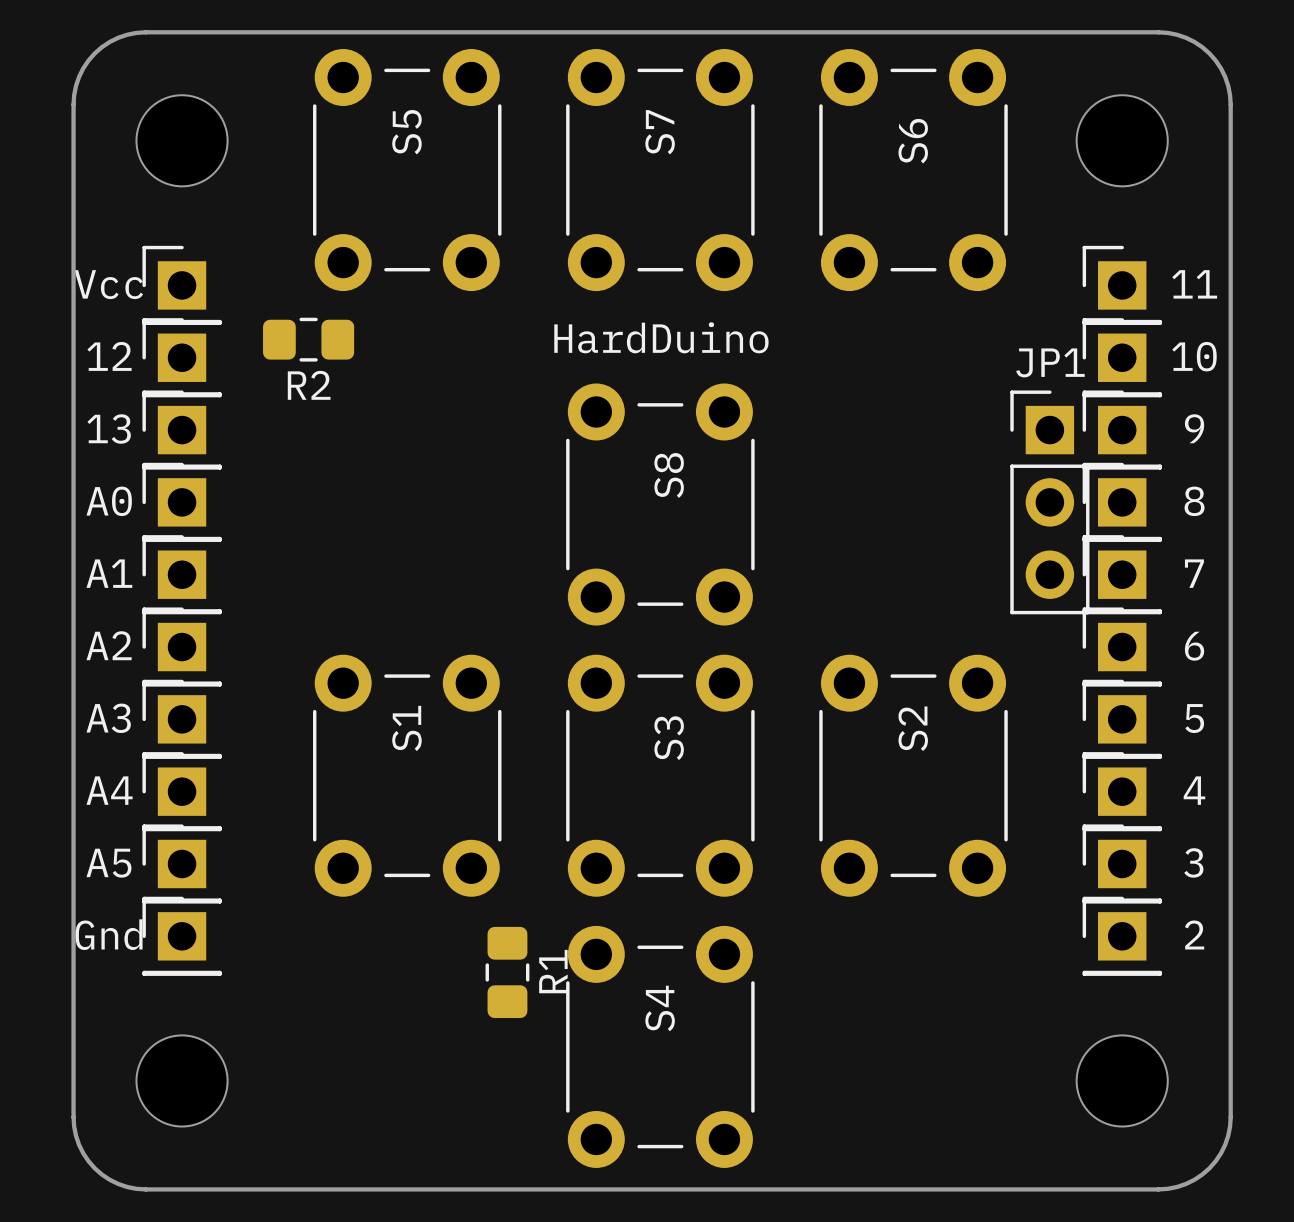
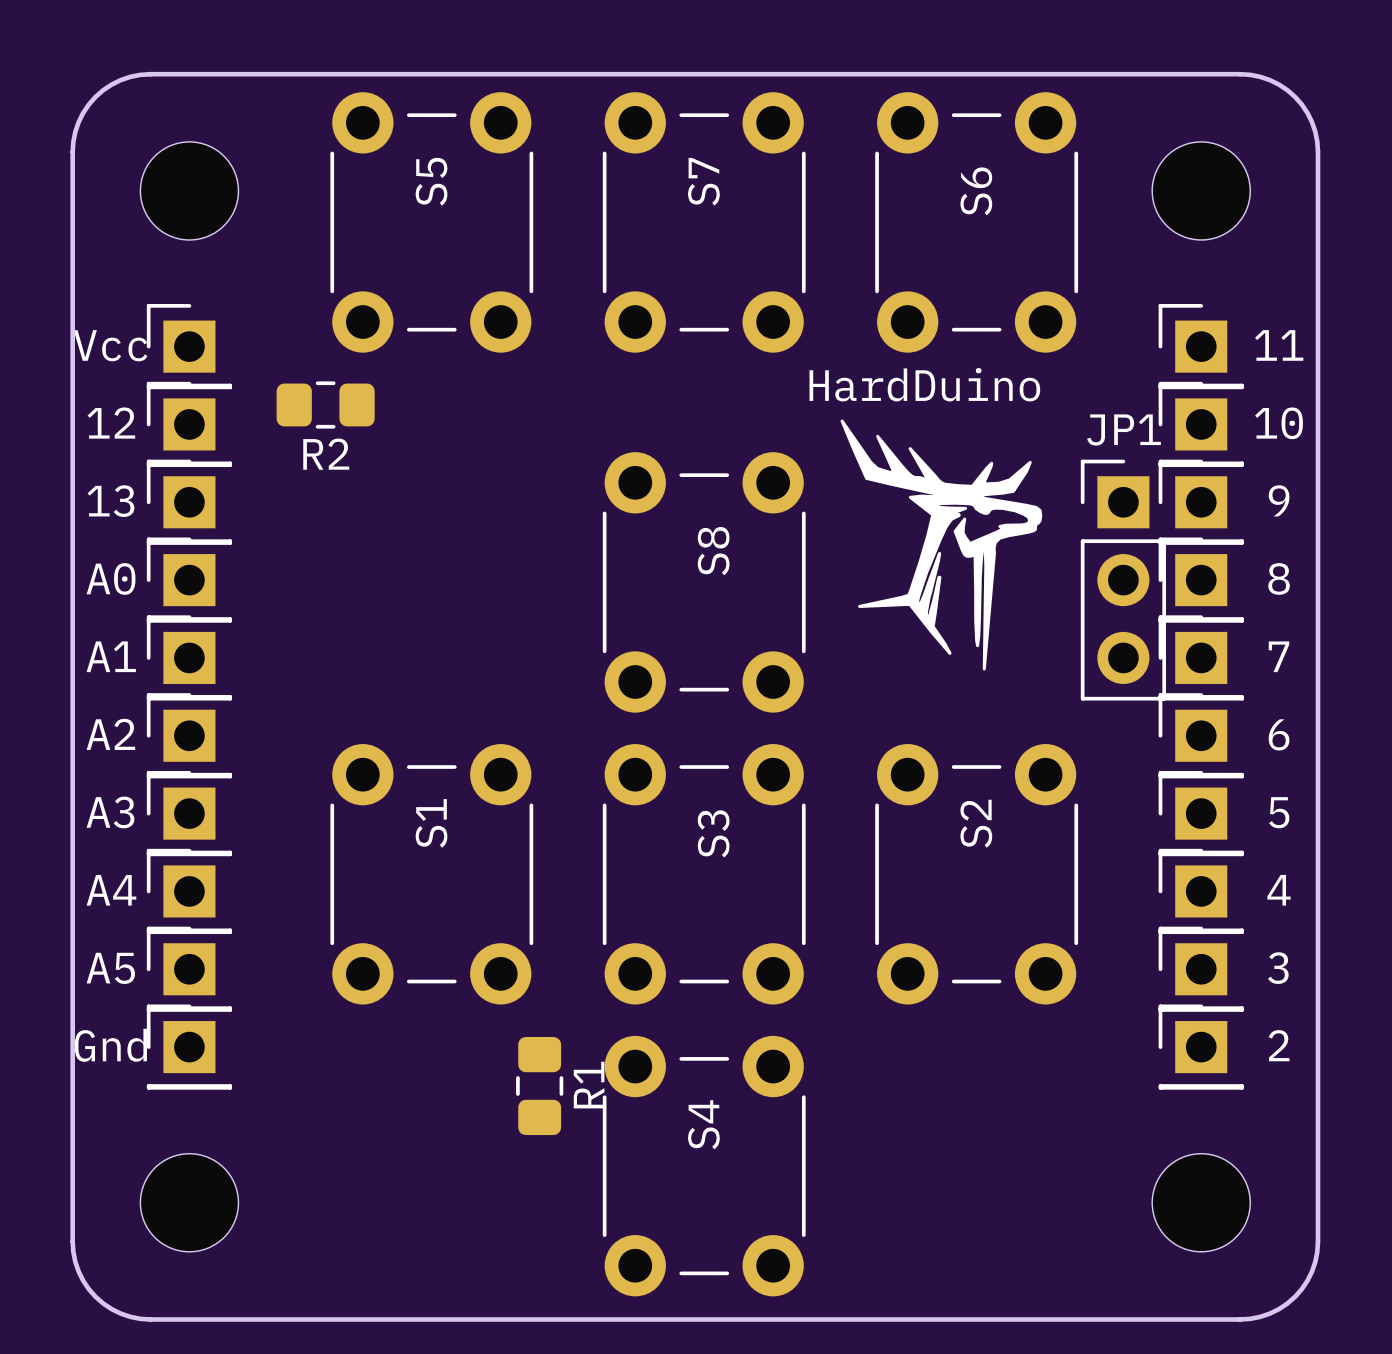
text position: HardDuino (661, 337) -> HardDuino (924, 384)
drawing: none -> [840, 419, 1043, 671]

